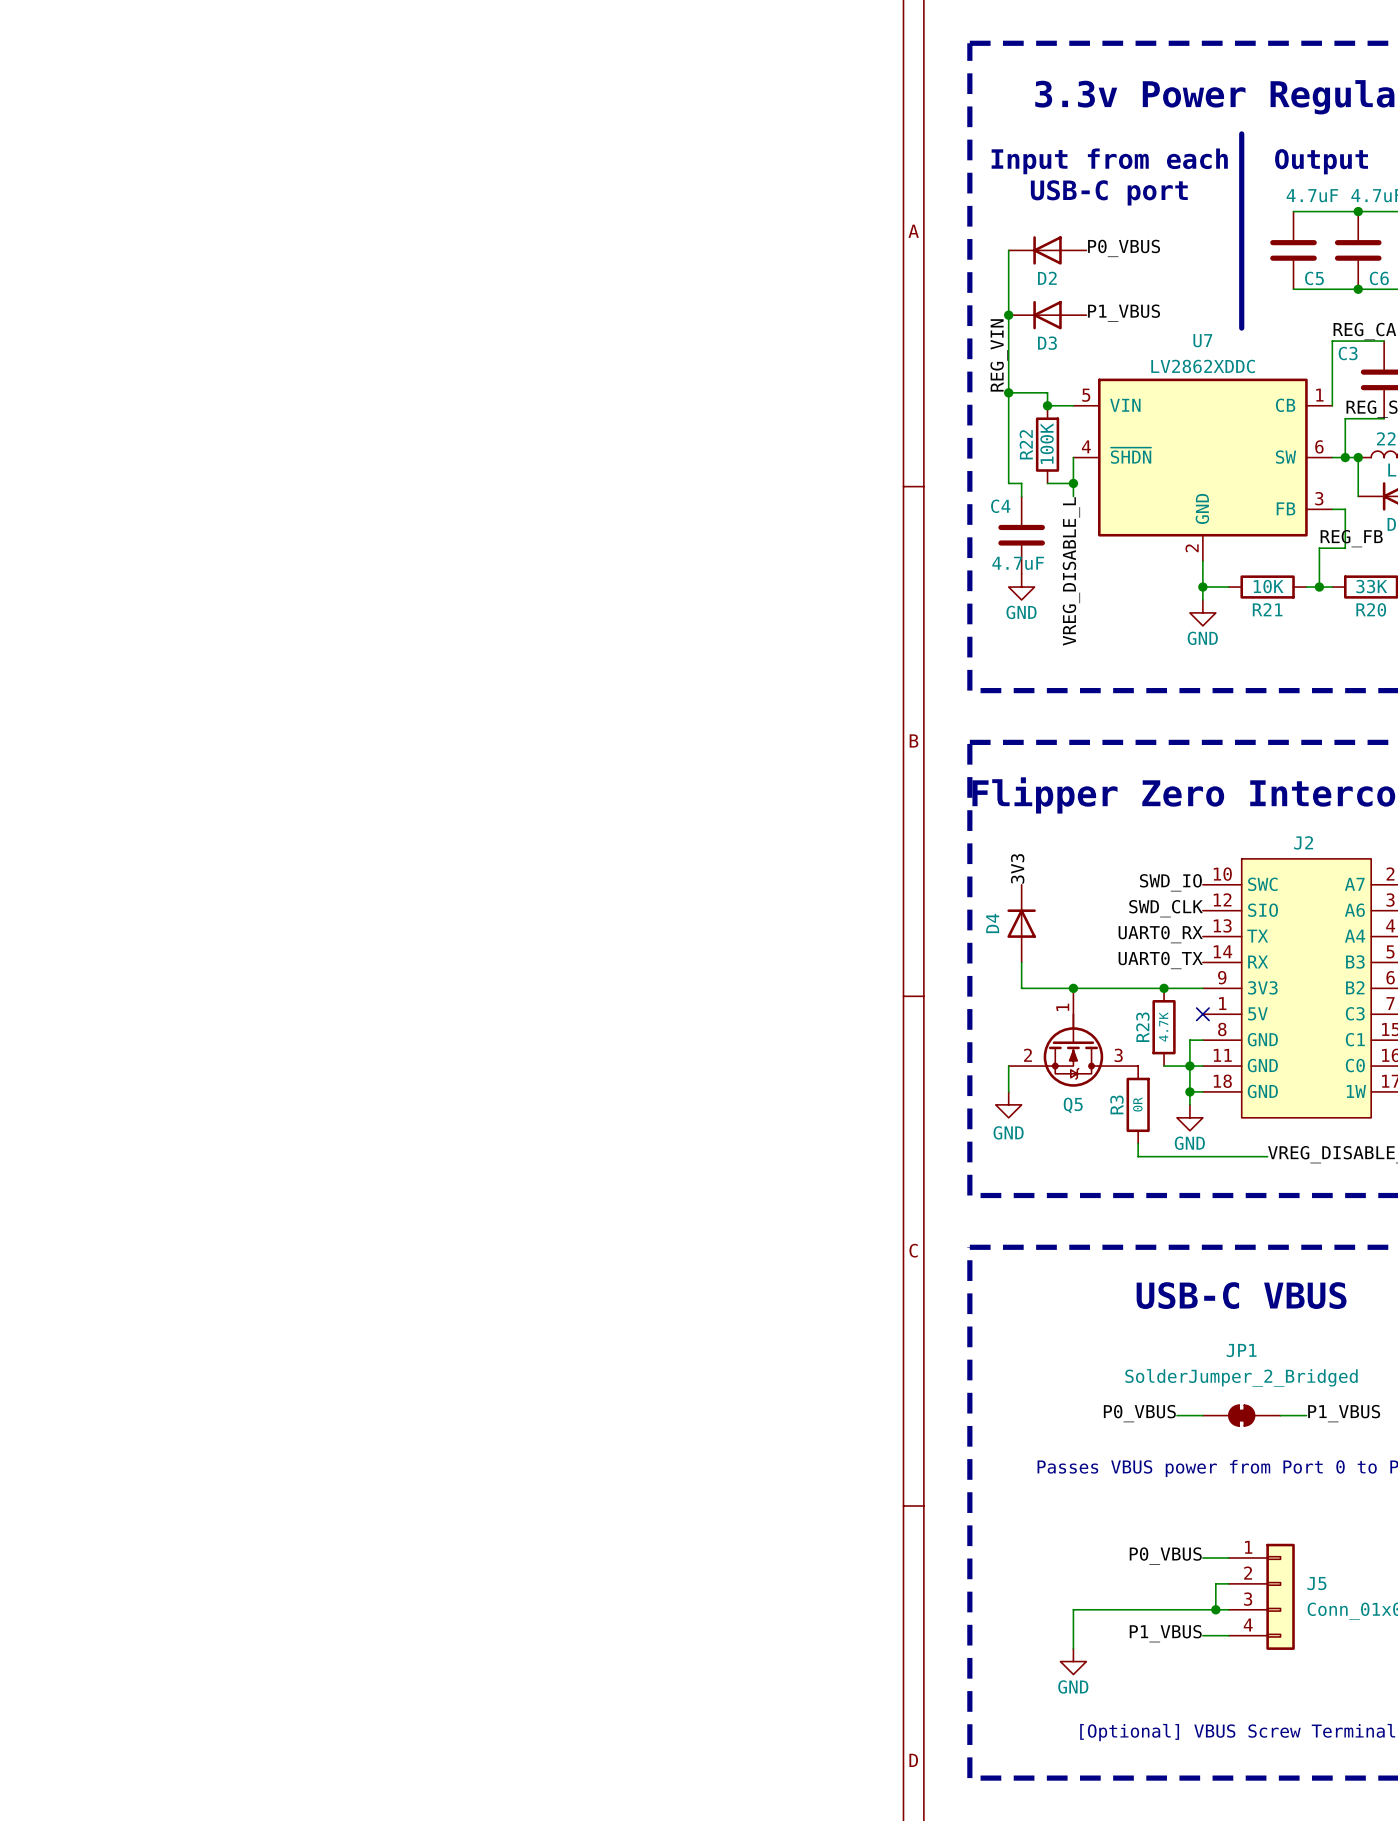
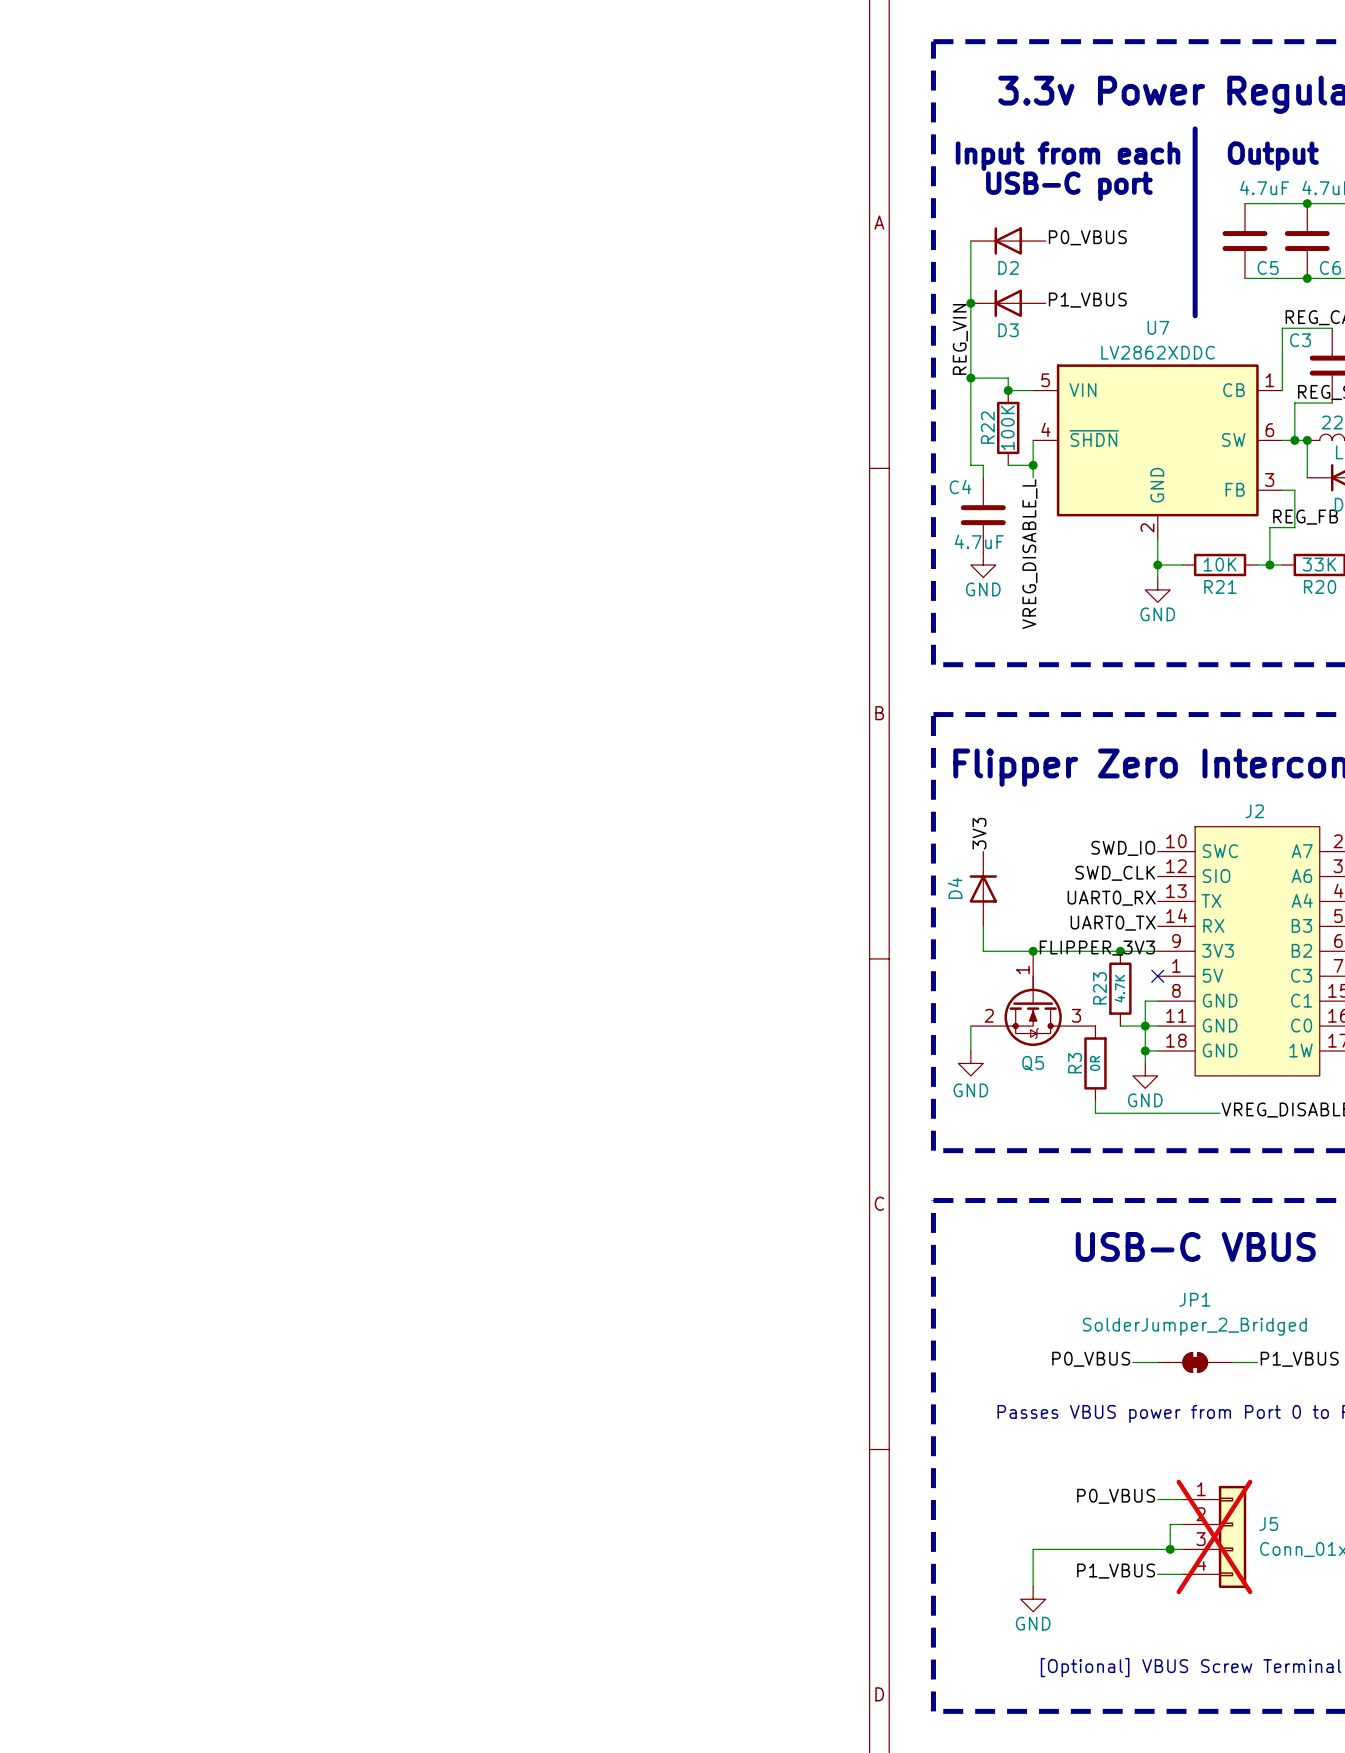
label: none -> FLIPPER_3V3 (1097, 948)
J5 do-not-place cross: none -> (1214, 1536)

